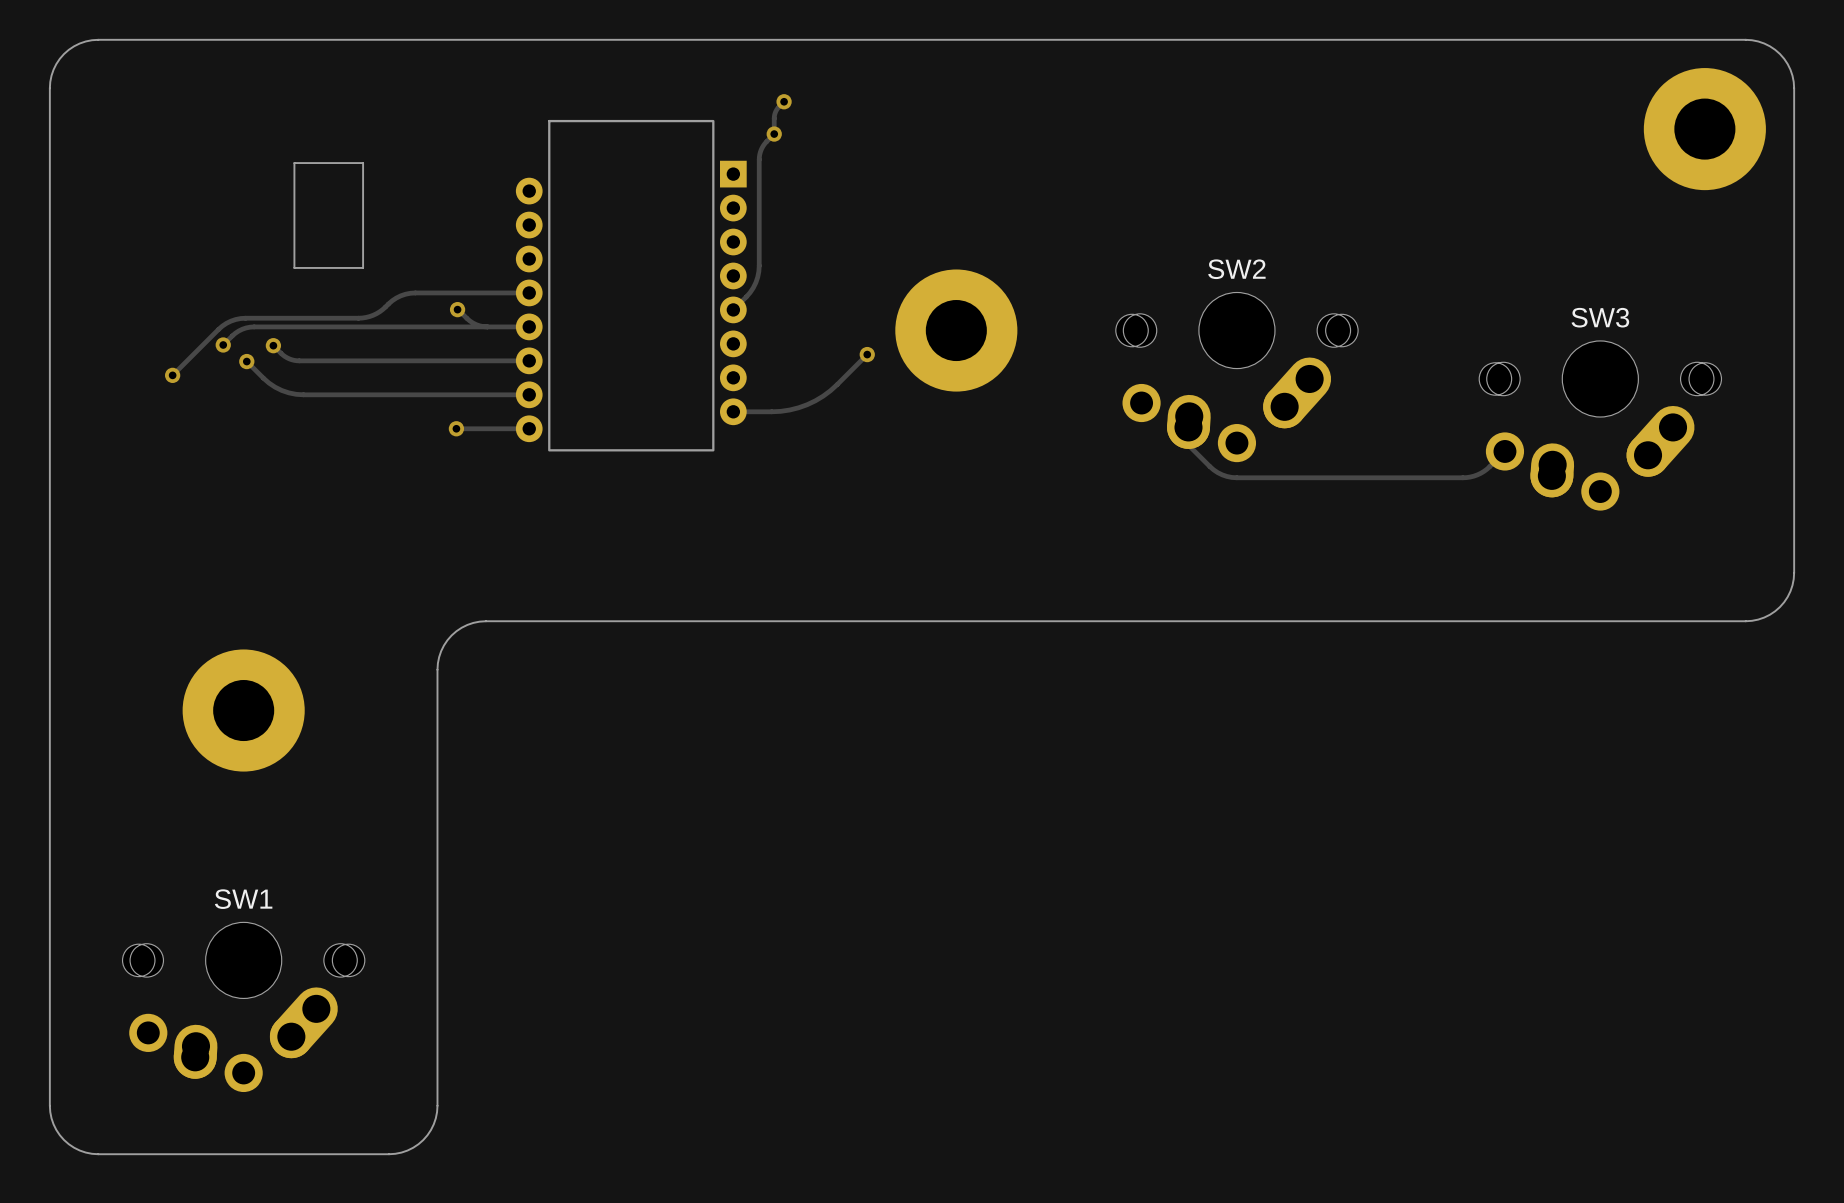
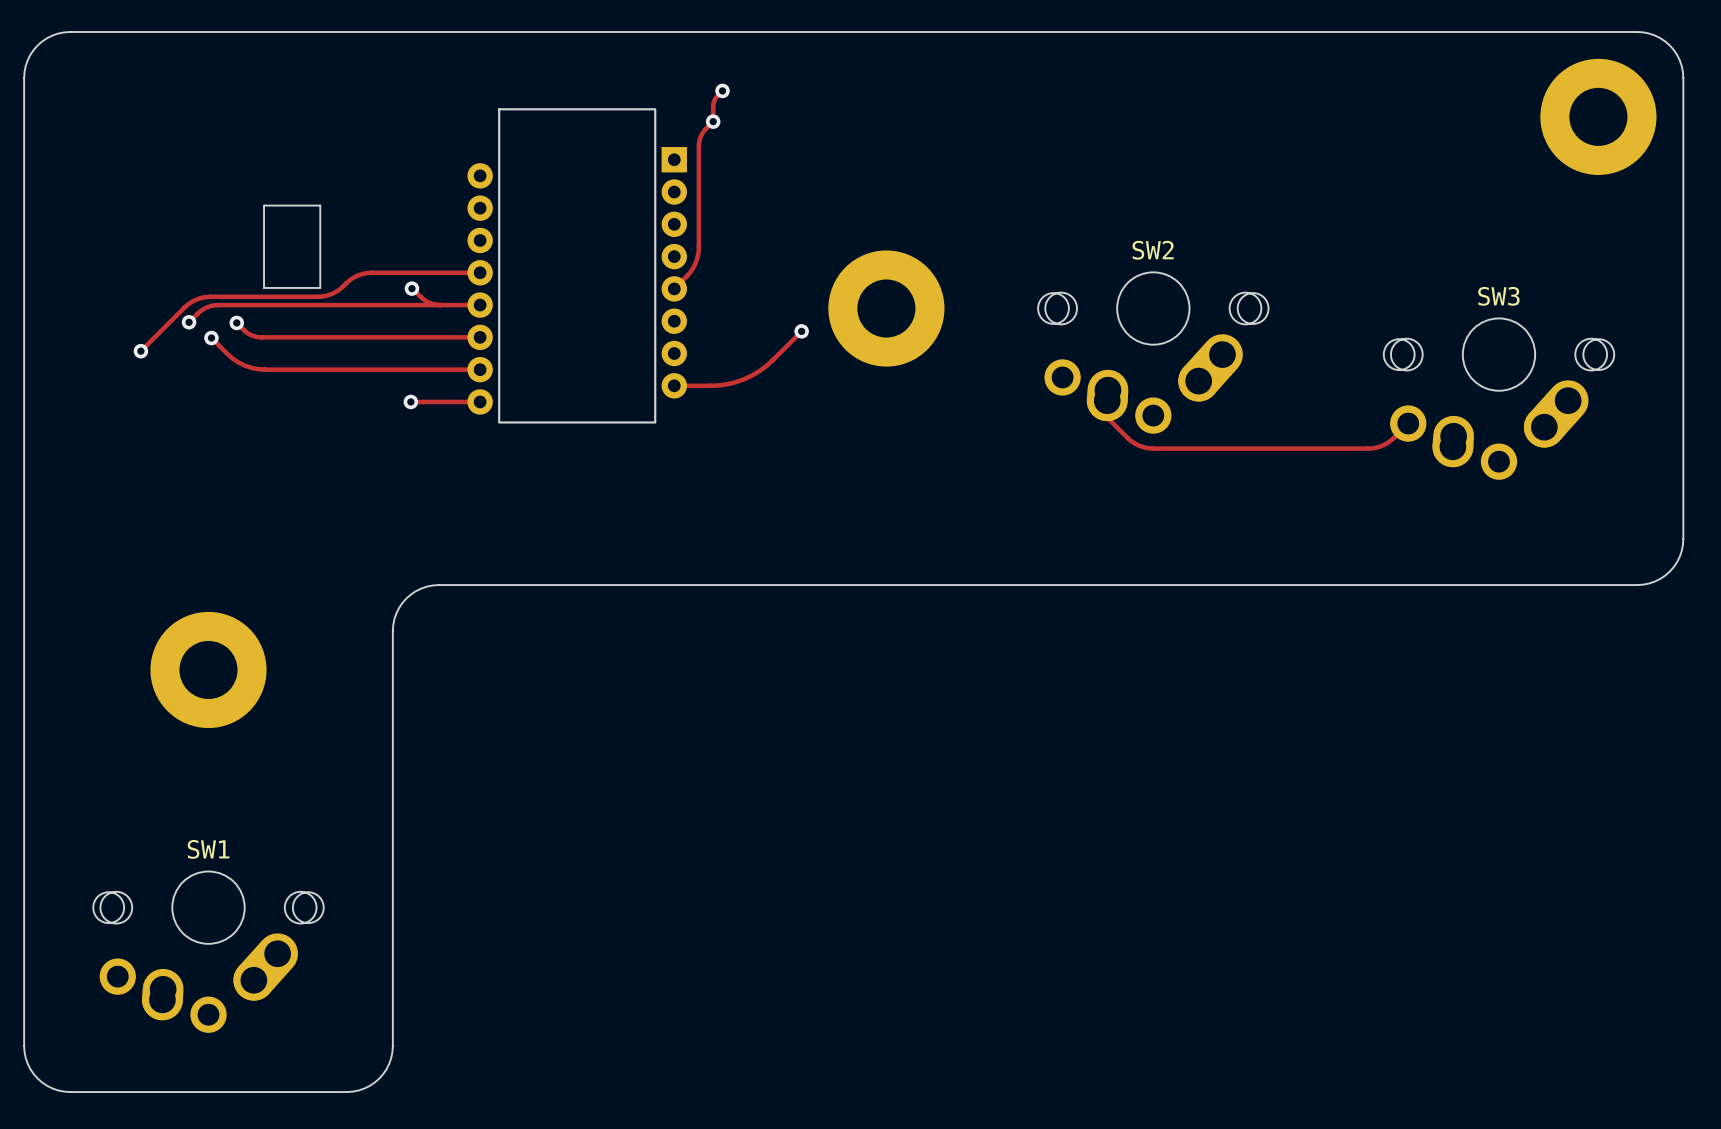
board edge: (294, 163) (363, 163) (363, 267) (294, 267) (294, 163) -> none
board edge: none -> (264, 205) (320, 205) (320, 287) (264, 287) (264, 205)

